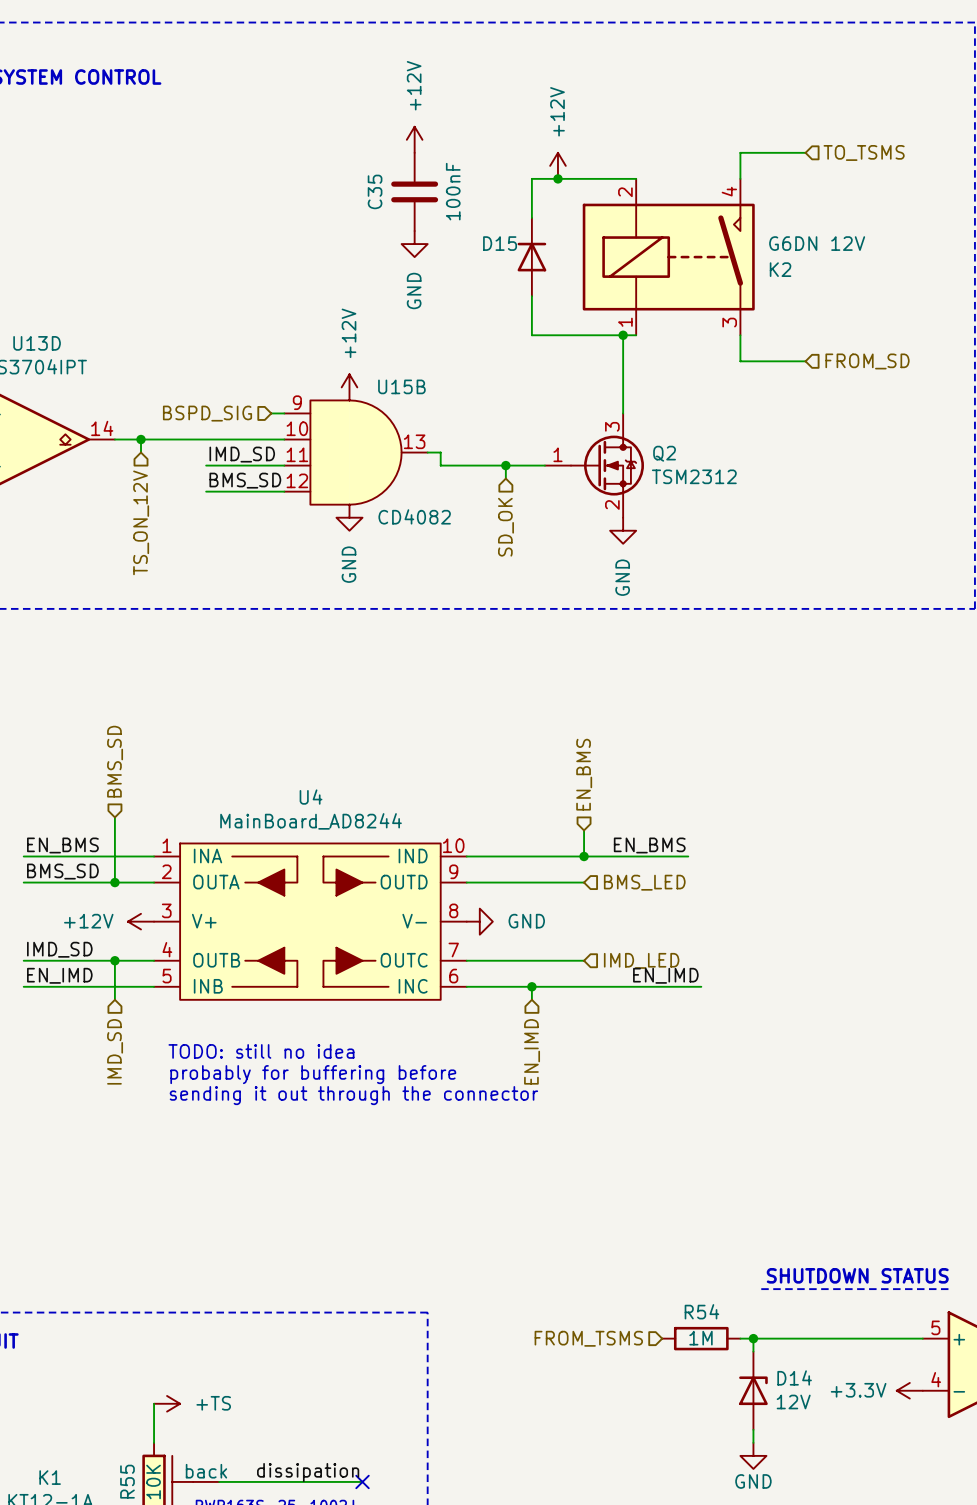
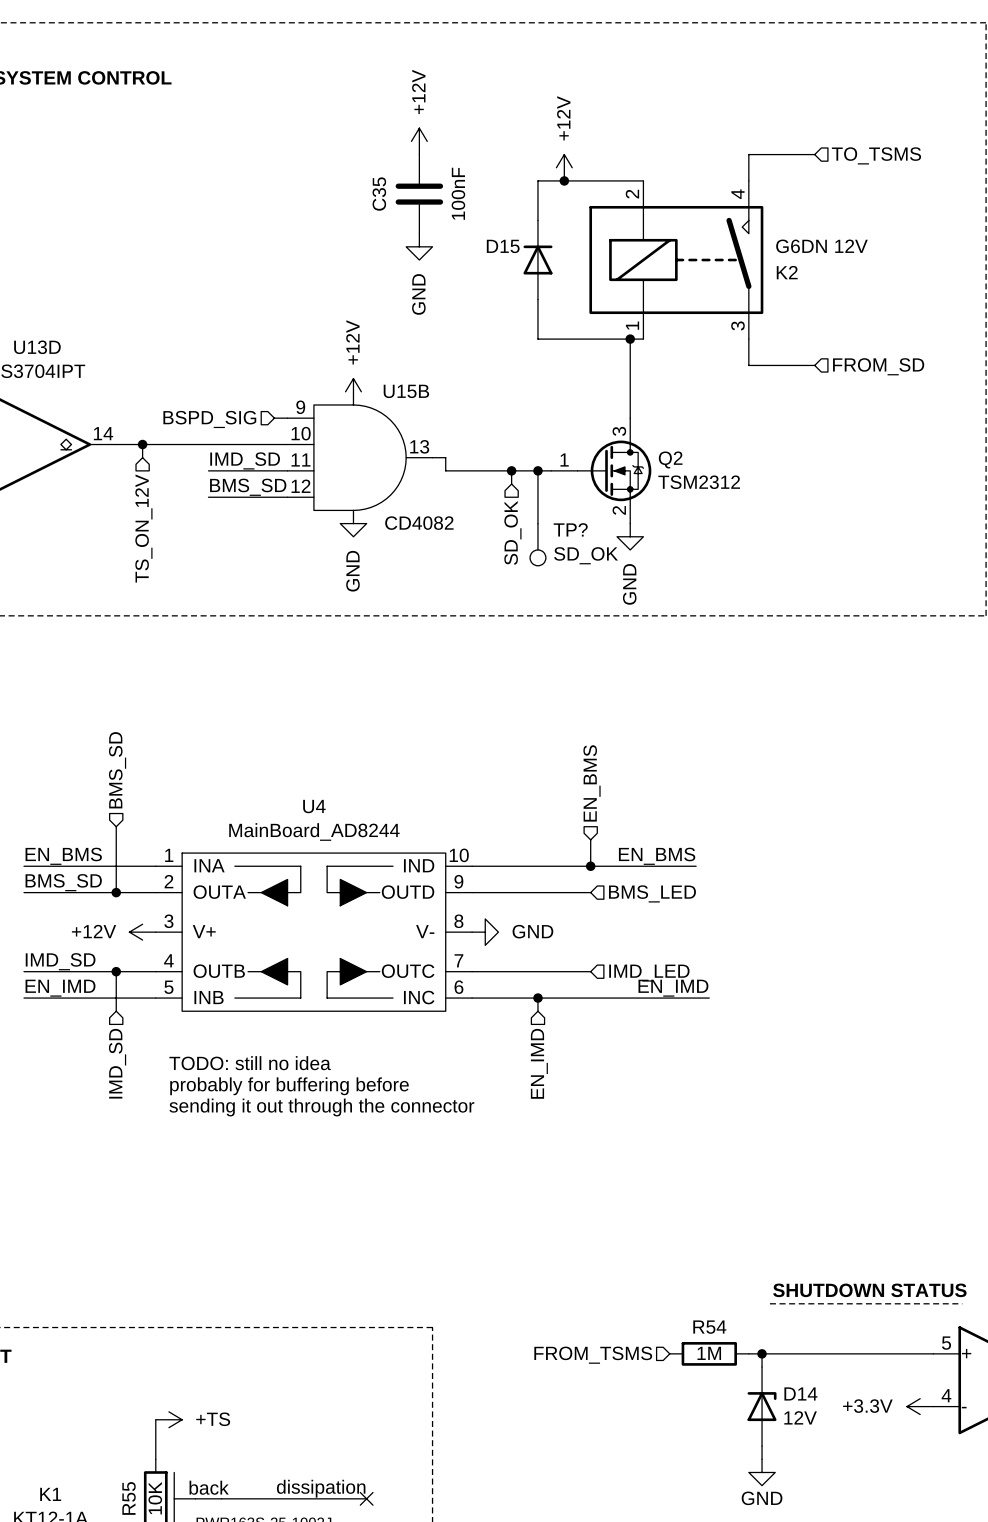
wire: none -> (537, 470) (537, 523)
junction: none -> (537, 470)
TP?: none -> SD_OK (537, 544)

